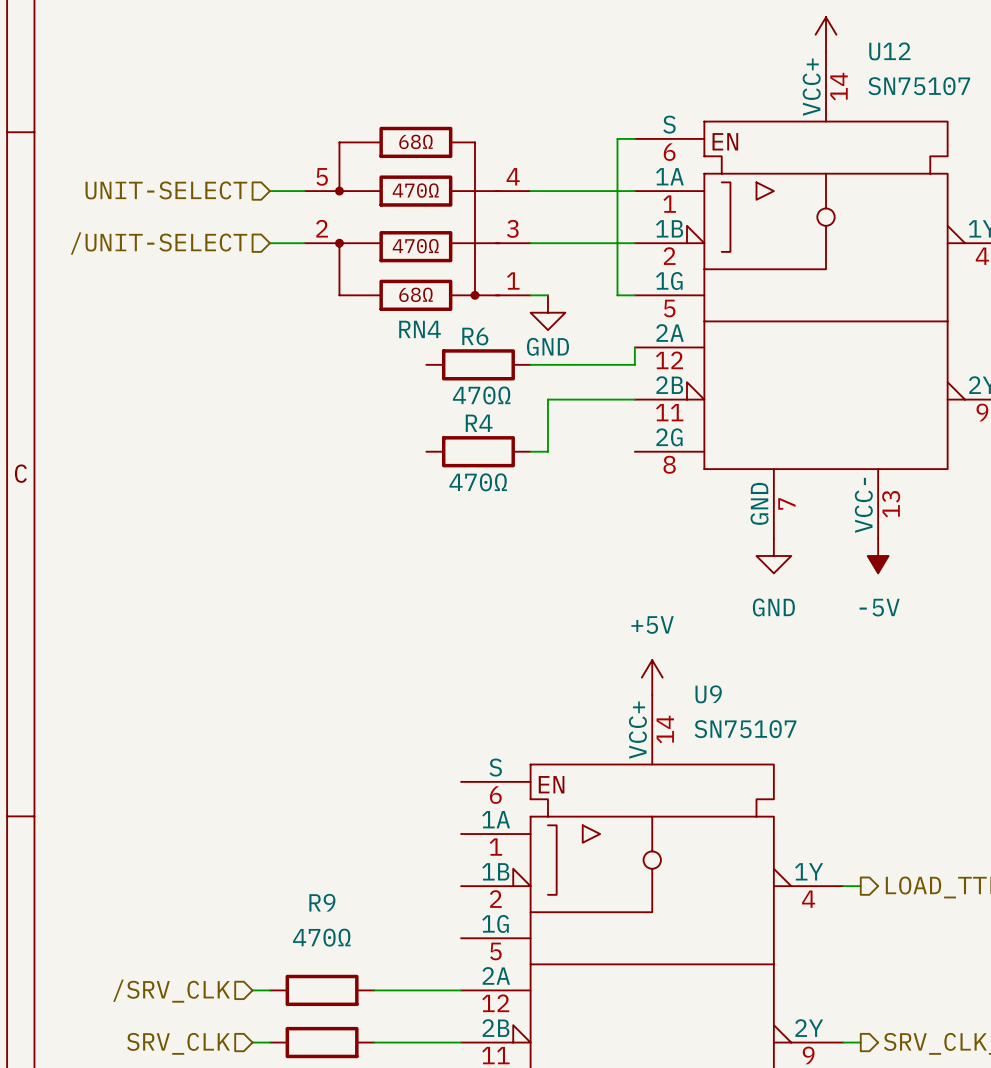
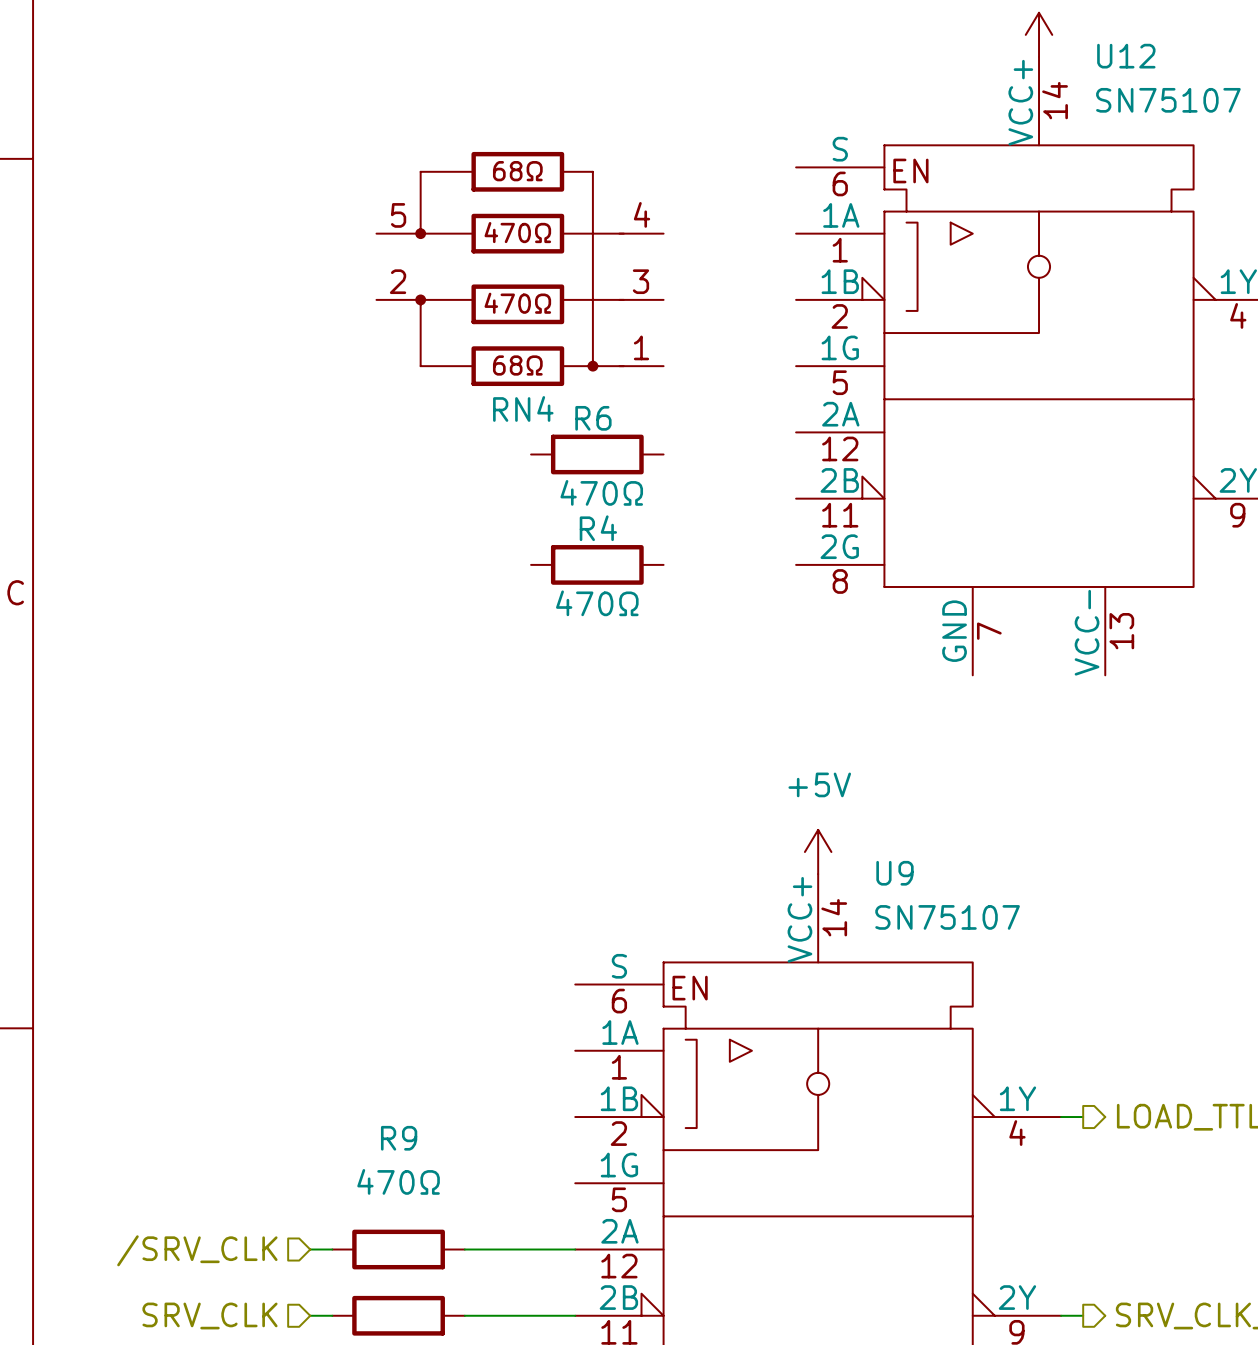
wire: (634, 138) (617, 138) (617, 295) (634, 295) -> none
hierarchical label: UNIT-SELECT (166, 190) -> none
wire: (269, 191) (304, 191) -> none
wire: (530, 191) (634, 191) -> none
hierarchical label: /UNIT-SELECT (159, 243) -> none
wire: (269, 243) (304, 243) -> none
wire: (530, 243) (634, 243) -> none
wire: (530, 295) (547, 295) -> none
power symbol: GND (547, 312) -> none
wire: (634, 347) (634, 364) (530, 364) -> none
wire: (634, 399) (547, 399) (547, 451) (530, 451) -> none
power symbol: GND (773, 555) -> none
power symbol: -5V (878, 555) -> none

